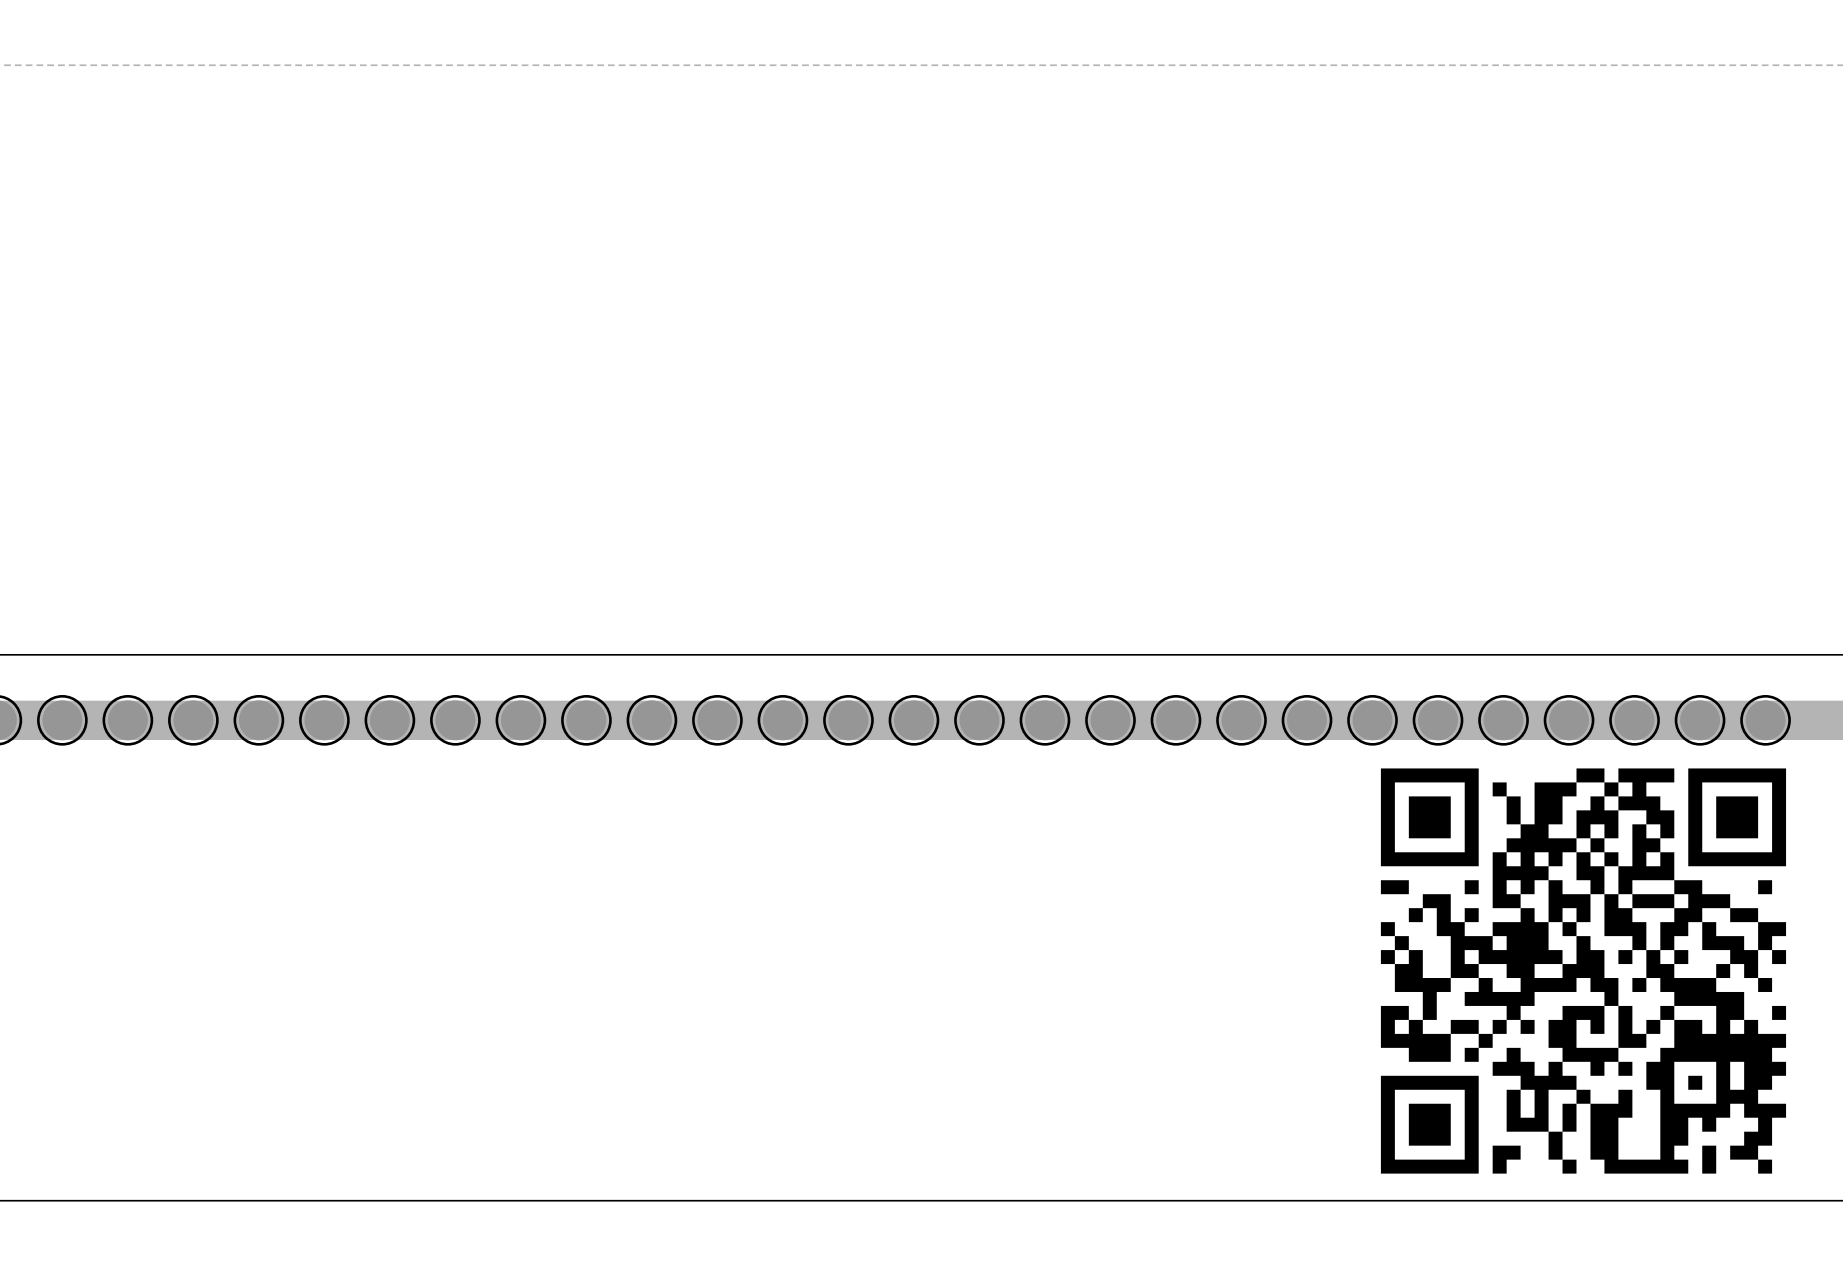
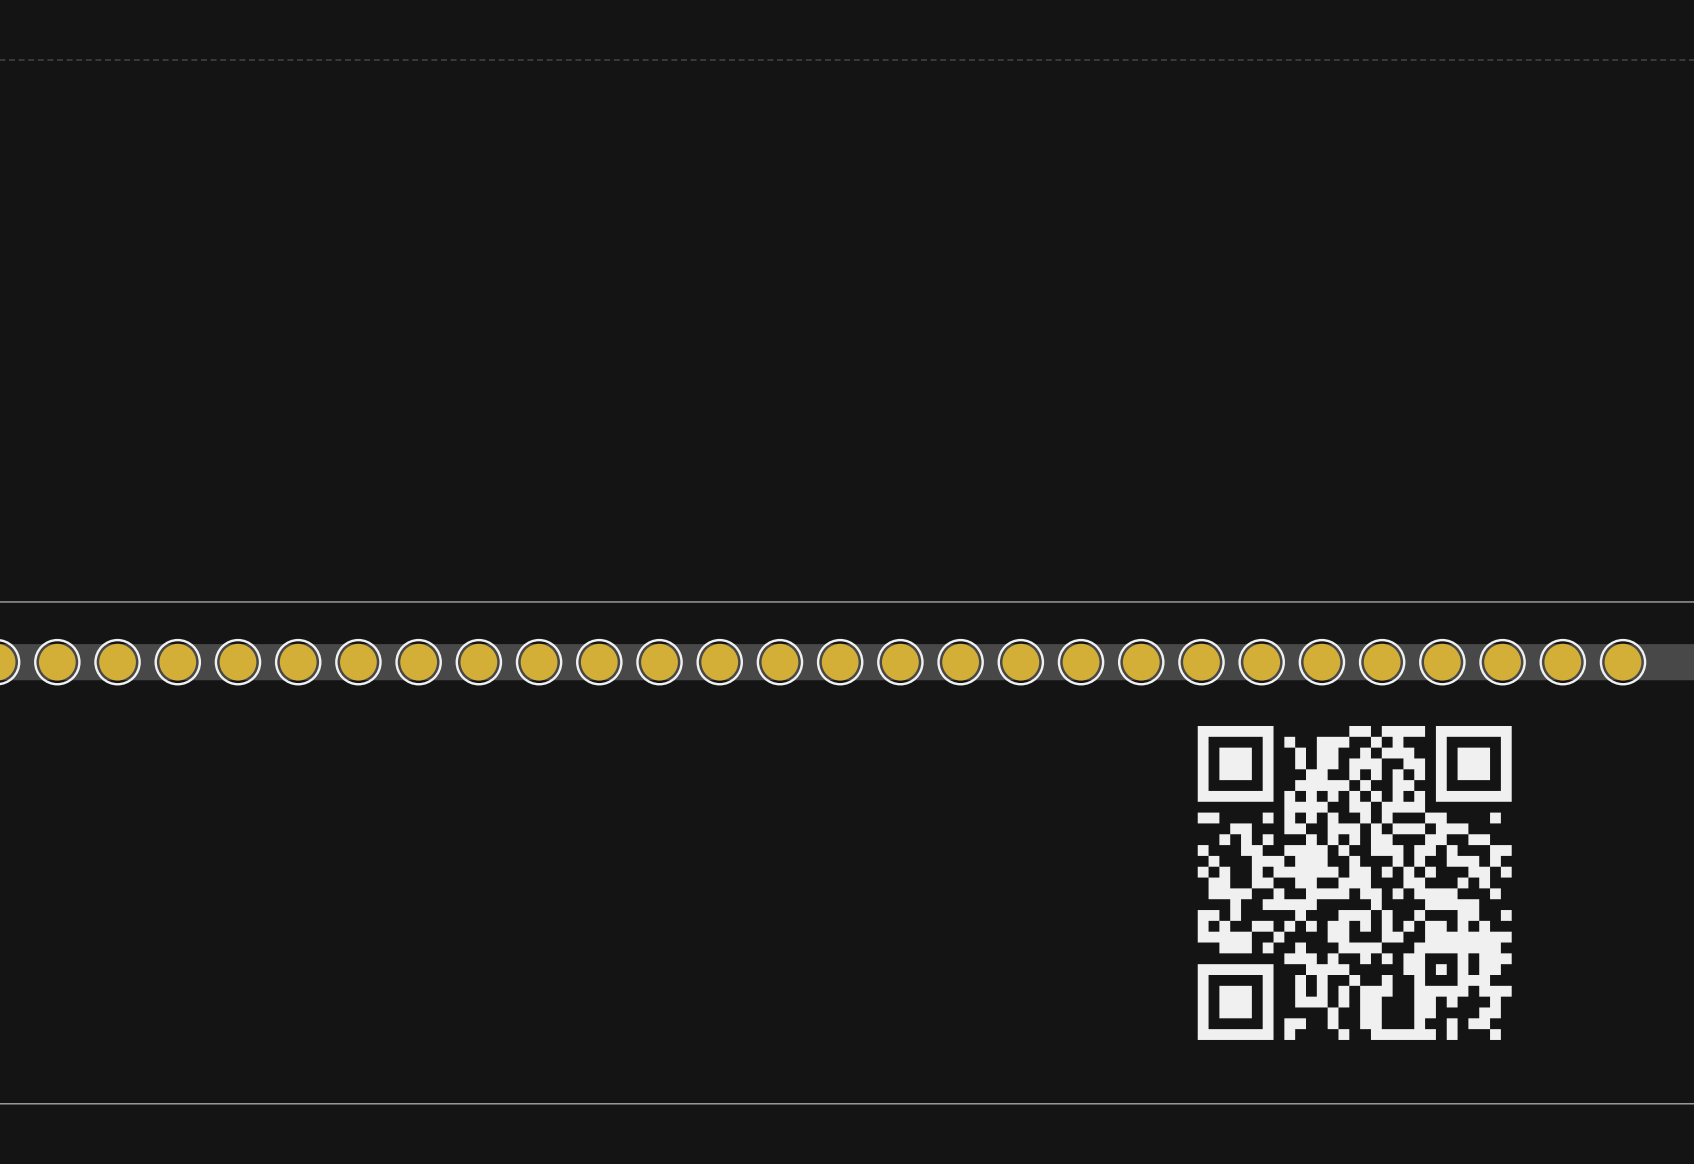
drawing: [1380, 768, 1787, 1174] -> none
drawing shape: [1492, 782, 1507, 797] -> [1349, 725, 1382, 748]
drawing: none -> [1197, 725, 1512, 1040]
drawing shape: [1380, 880, 1409, 895] -> [1262, 812, 1274, 824]
drawing shape: [1562, 1103, 1577, 1132] -> [1446, 1018, 1458, 1040]

